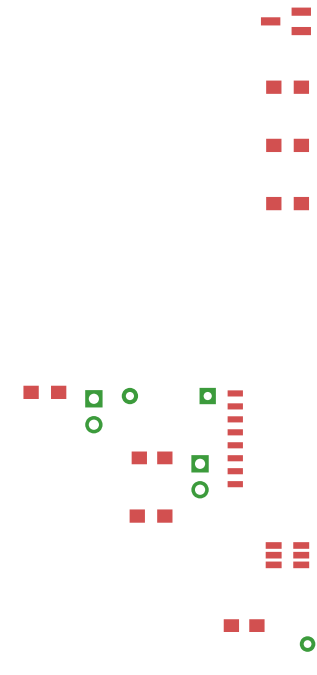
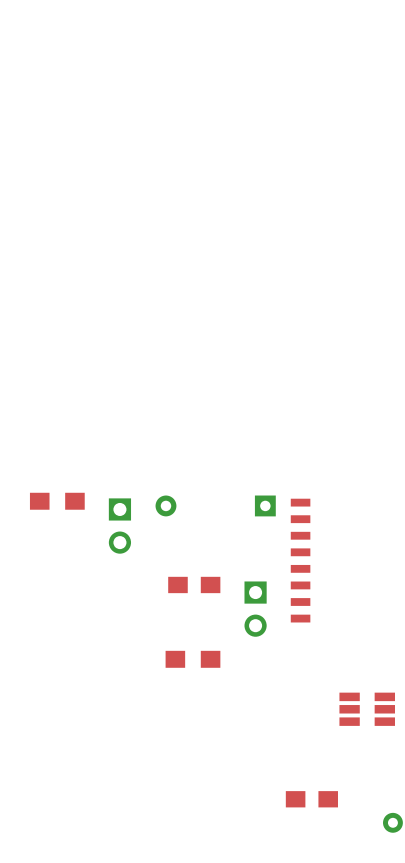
part: (285, 21) -> none
part: (287, 87) -> none
part: (287, 145) -> none
part: (287, 203) -> none

